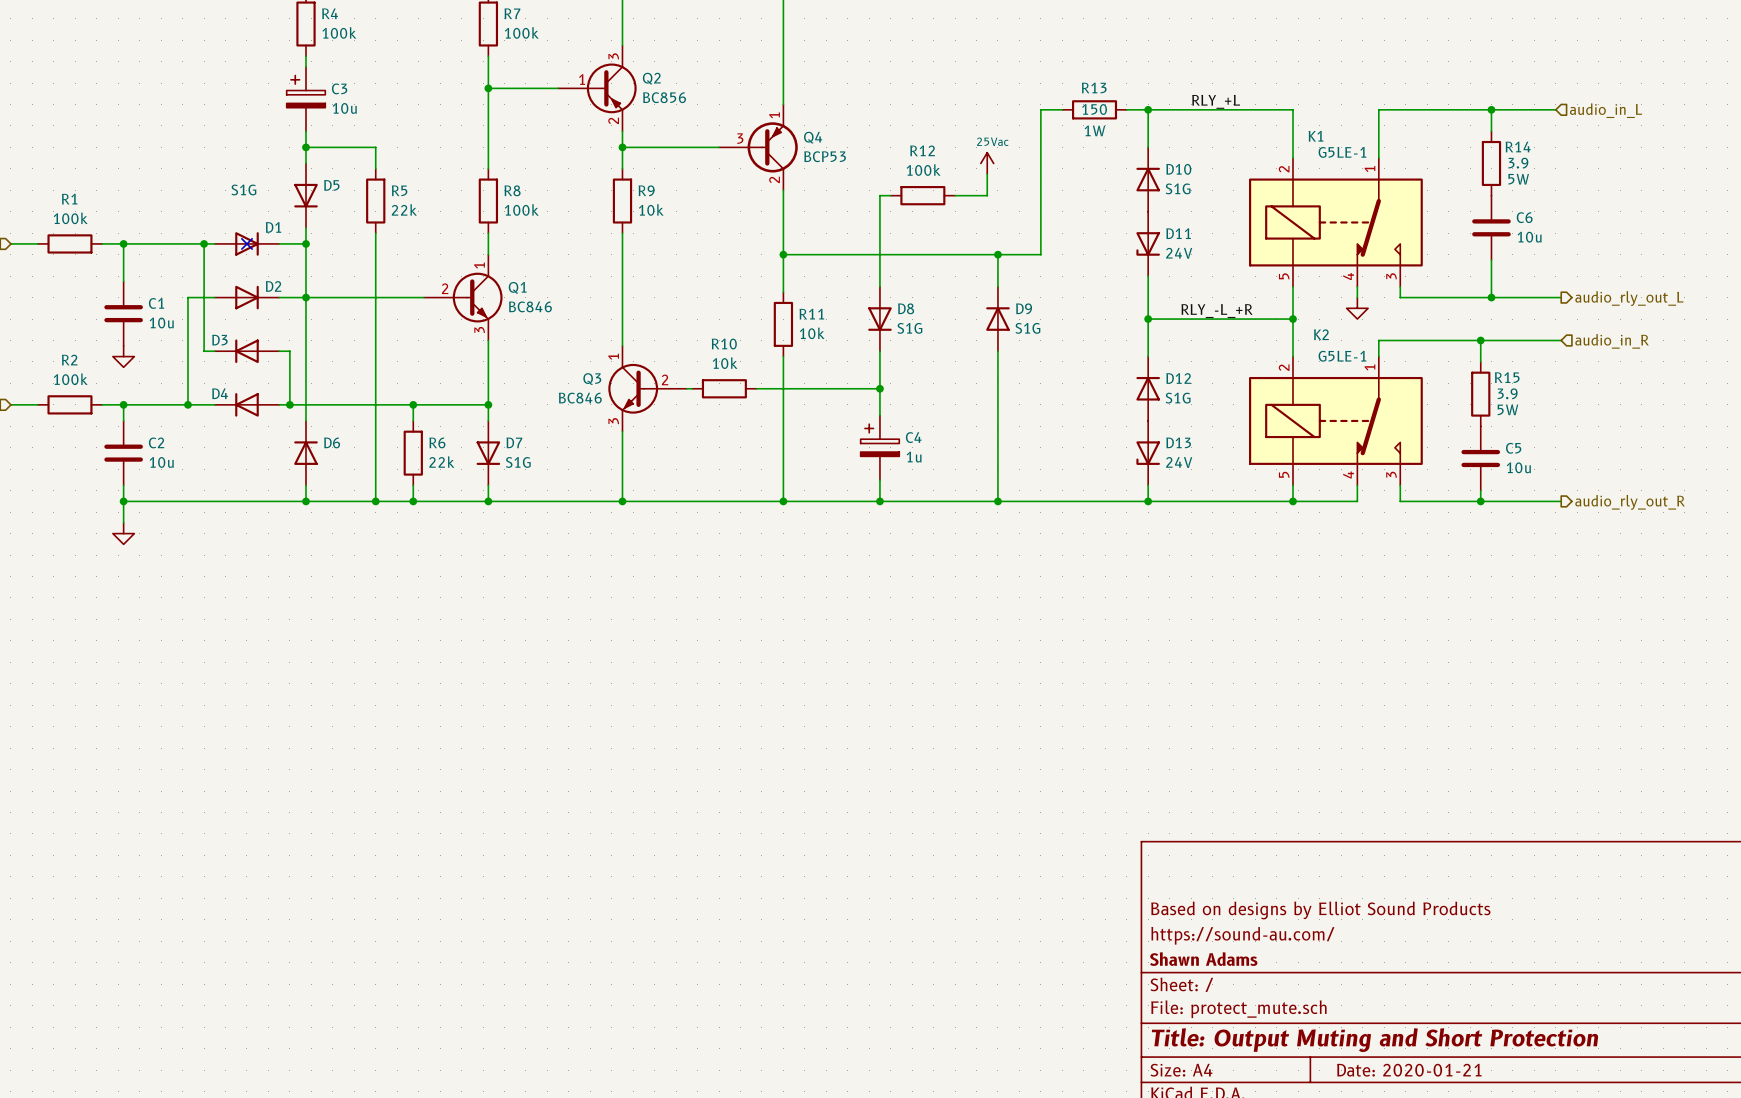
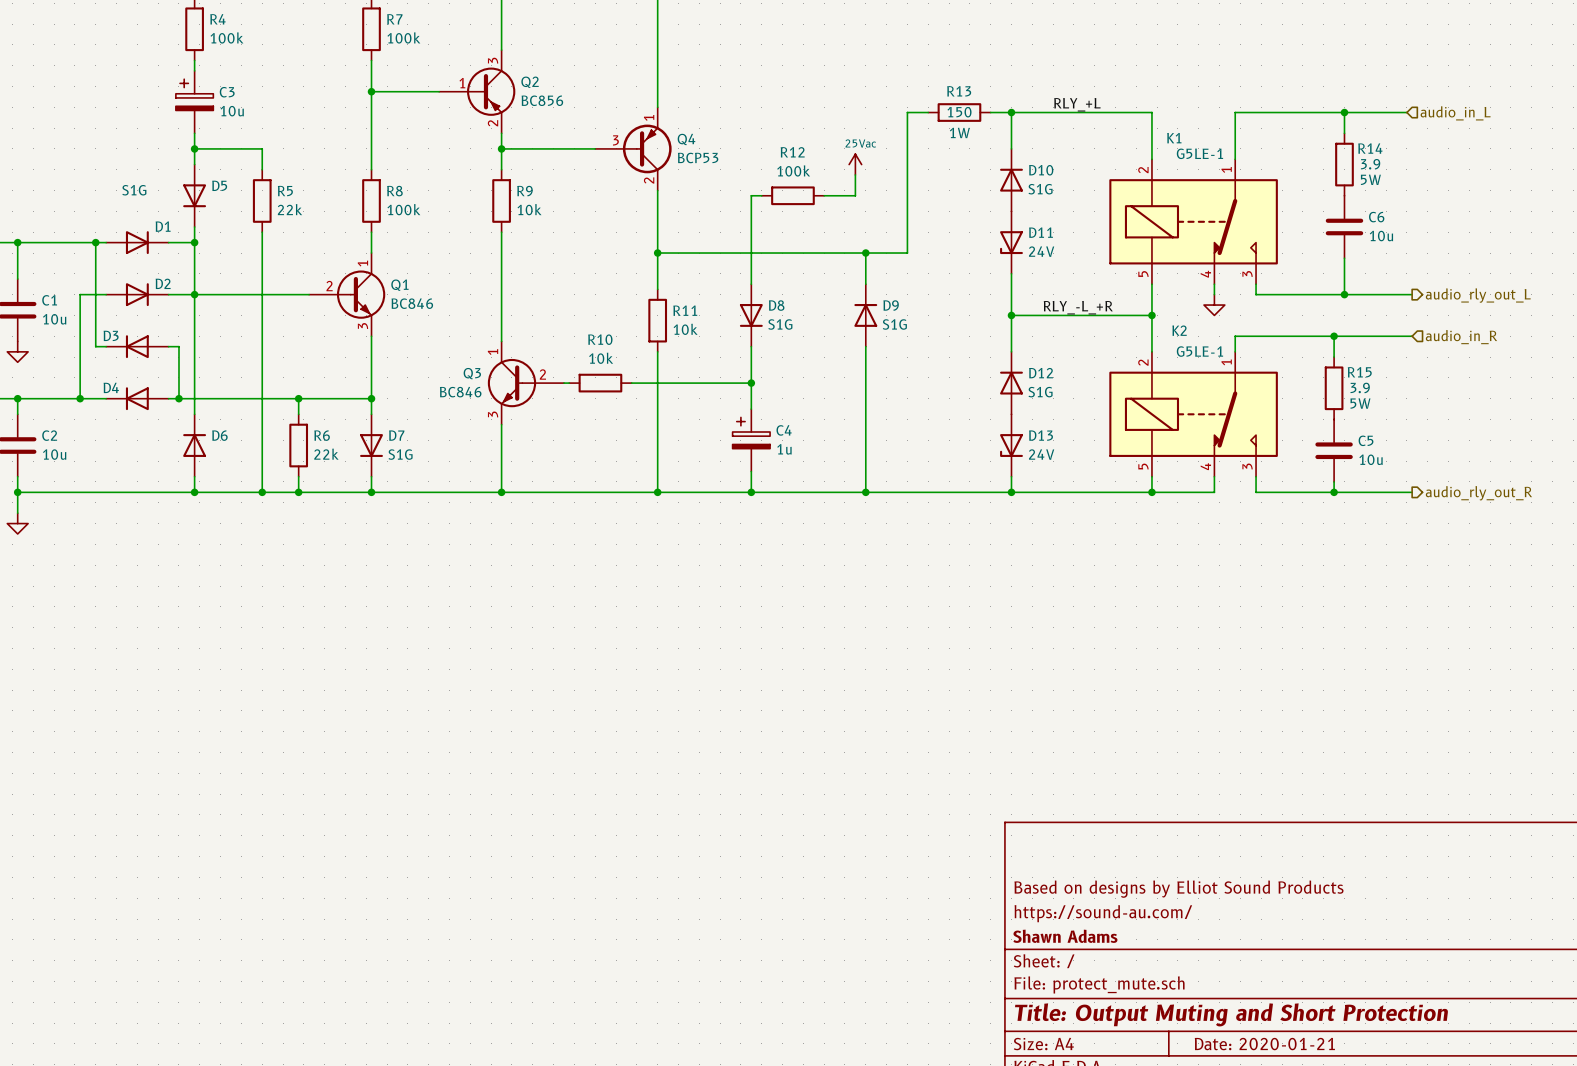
no-connect mark: (246, 243) -> none

